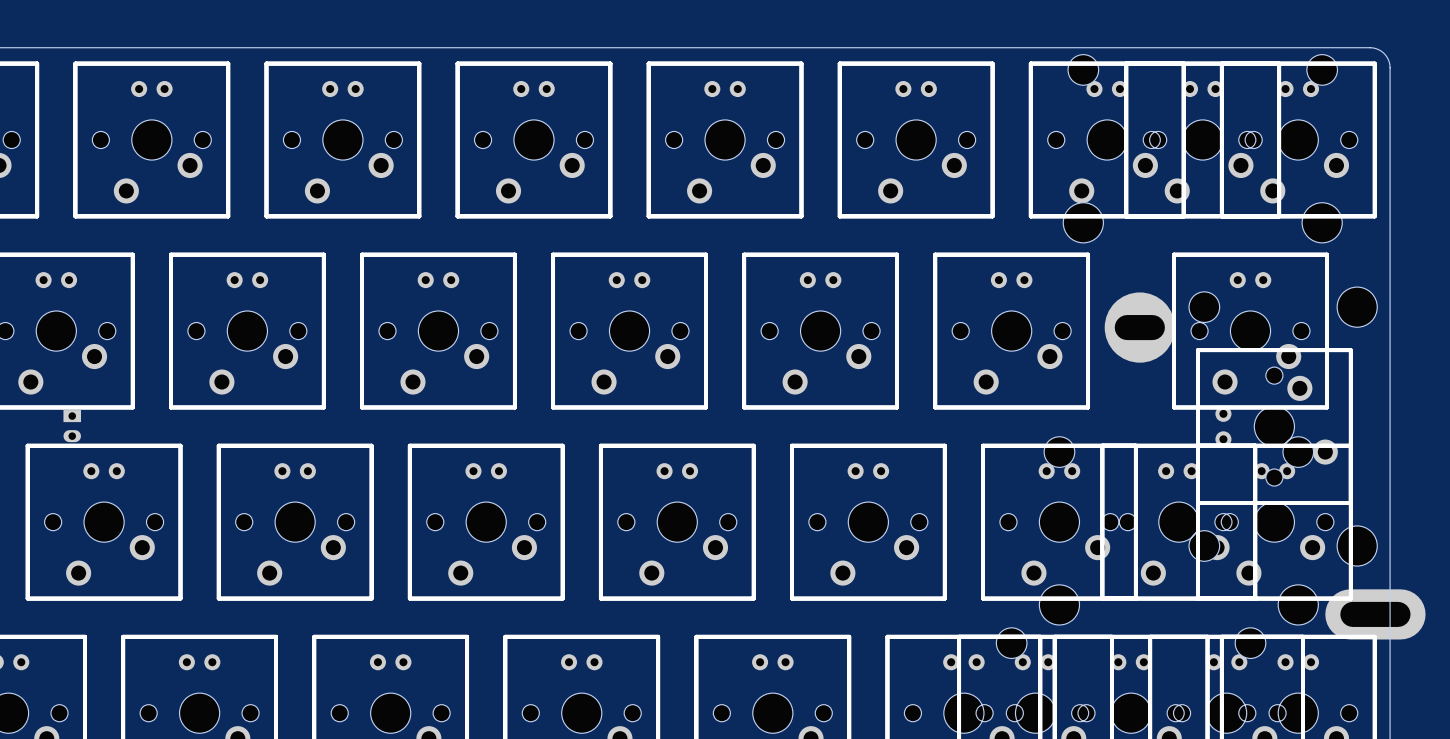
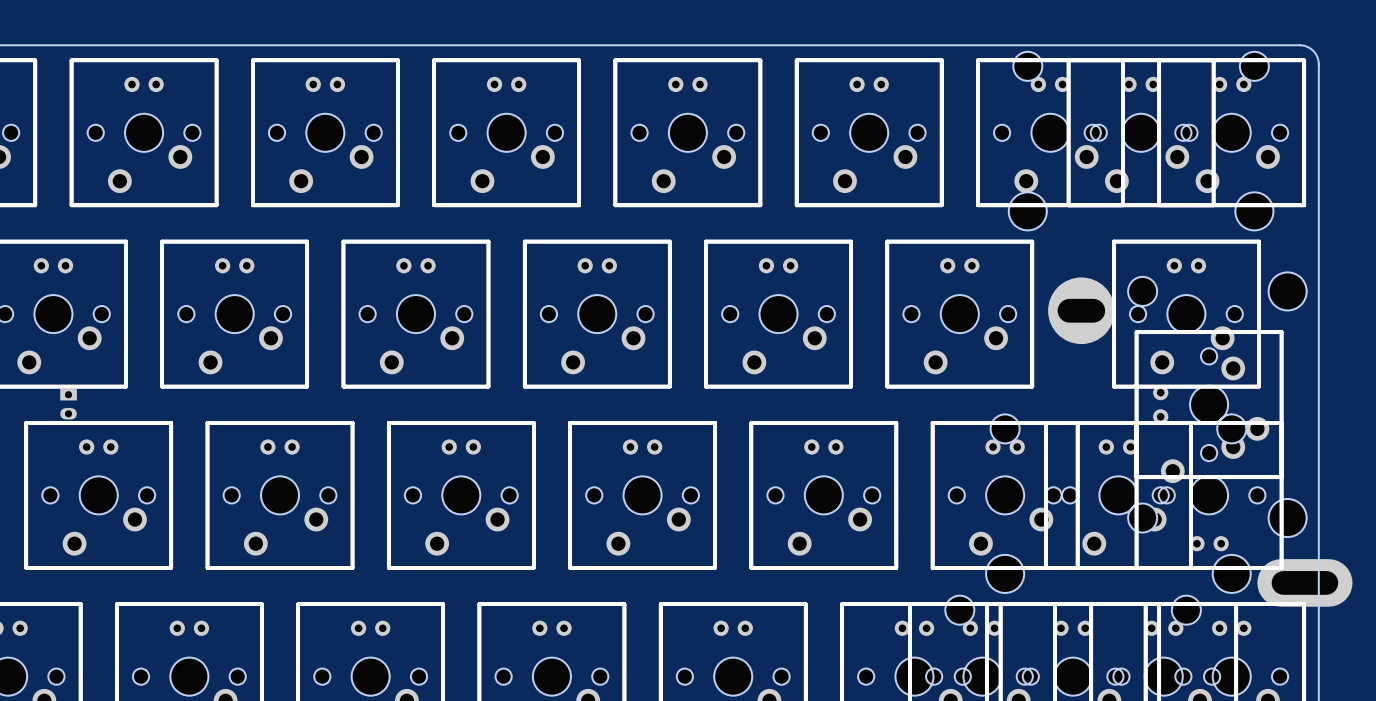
part rotation: 0° (1274, 522) -> 180° (1209, 495)
part rotation: 0° (1274, 522) -> 180° (1209, 495)

